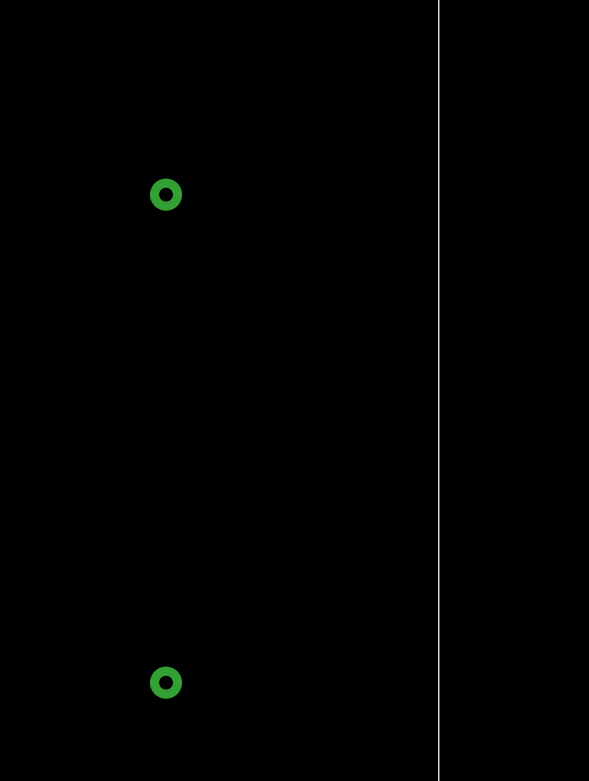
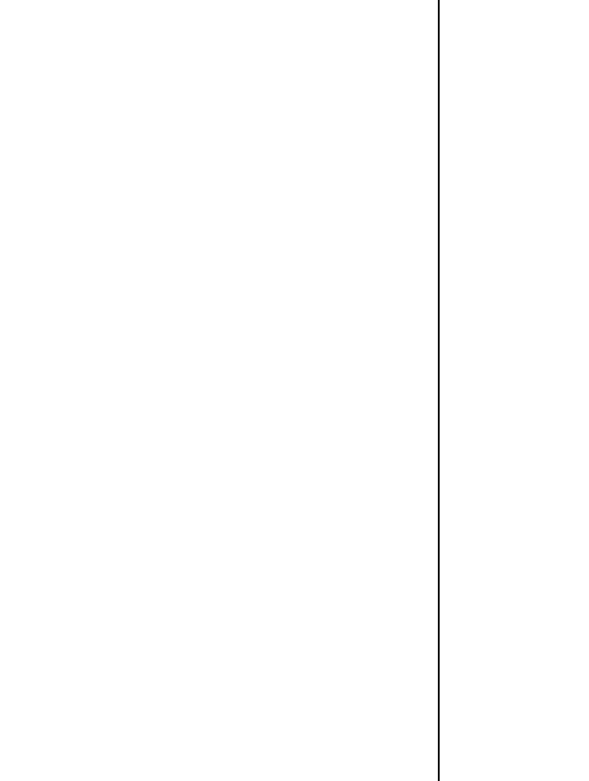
via: (166, 194) -> none
via: (166, 682) -> none

